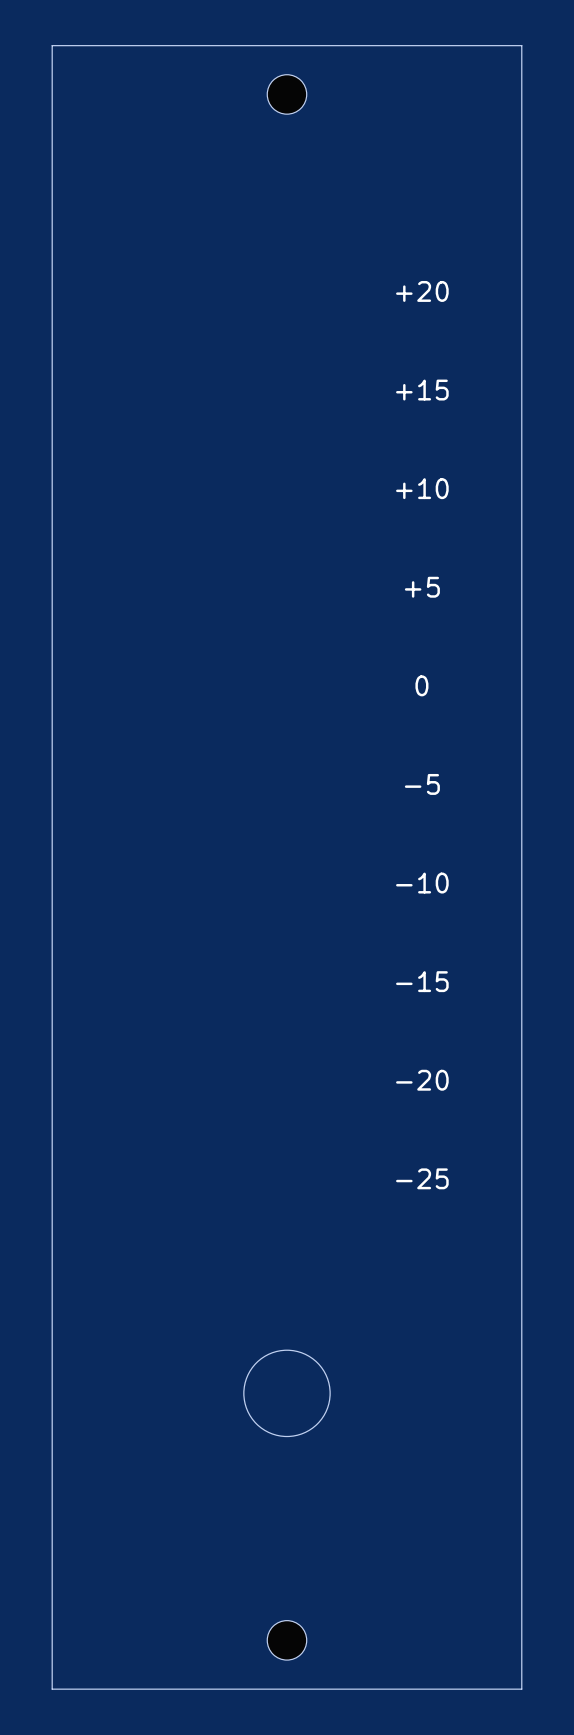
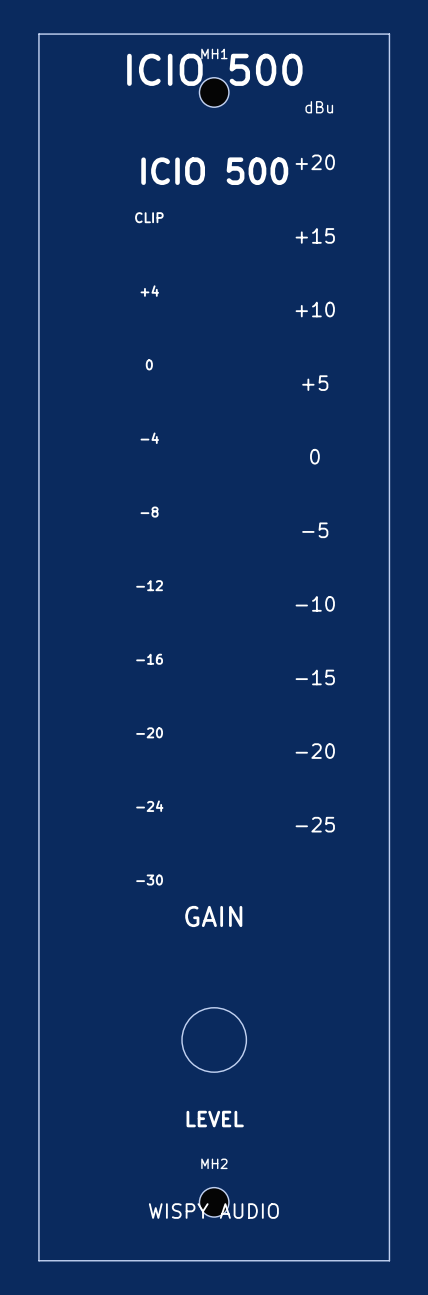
text: none -> ICIO 500 (214, 69)
part: (286, 94) -> none
MH1: none -> (214, 92)
text: none -> dBu (319, 107)
text: none -> ICIO 500 (214, 171)
text: none -> CLIP (149, 217)
text position: +20 (422, 291) -> +20 (315, 162)
text: none -> +4 (149, 291)
text position: +15 (422, 390) -> +15 (315, 235)
text: none -> 0 (149, 364)
text position: +10 (422, 488) -> +10 (315, 309)
text: none -> -4 (149, 438)
text position: +5 (422, 587) -> +5 (315, 383)
text position: 0 (421, 685) -> 0 (314, 456)
text: none -> -8 (149, 512)
text: none -> -12 (149, 585)
text position: -5 (422, 784) -> -5 (315, 530)
text: none -> -16 (149, 659)
text position: -10 (422, 883) -> -10 (315, 603)
text: none -> -20 (149, 732)
text position: -15 (422, 981) -> -15 (315, 677)
text: none -> -24 (149, 806)
text position: -20 (422, 1080) -> -20 (315, 751)
text position: -25 (422, 1178) -> -25 (315, 824)
text: none -> -30 (149, 880)
text: none -> GAIN (213, 916)
text: none -> LEVEL (215, 1119)
MH2: none -> (214, 1202)
text: none -> WISPY AUDIO (213, 1211)
part: (286, 1640) -> none

